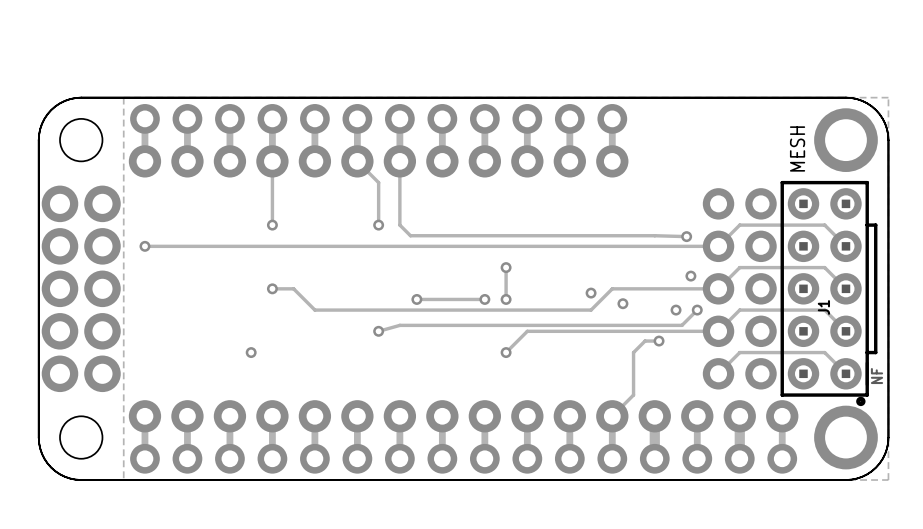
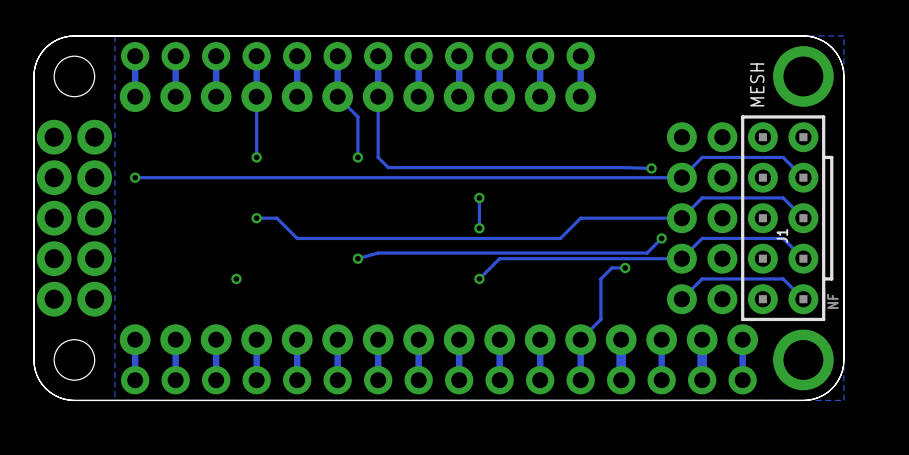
via: (690, 276) -> none
via: (591, 293) -> none
via: (416, 299) -> none
track: (484, 299) (416, 299) -> none
via: (484, 299) -> none
via: (622, 303) -> none
via: (676, 310) -> none
drawing: [856, 396, 866, 407] -> none

